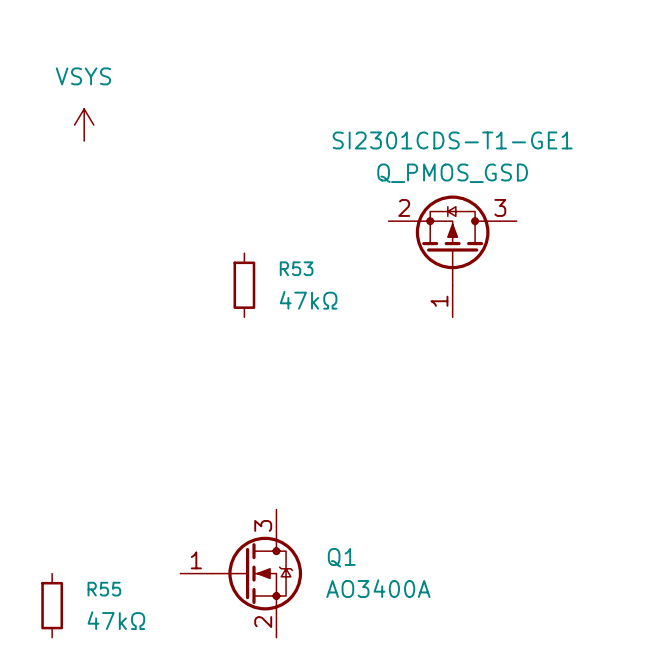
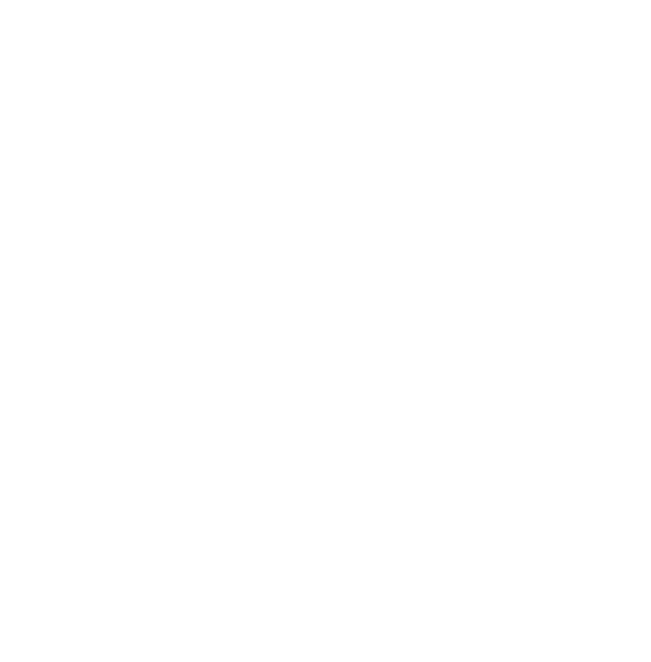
power symbol: VSYS (84, 125) -> none
SI2301CDS-T1-GE1: Q_PMOS_GSD (452, 256) -> none
R53: 47kΩ (244, 285) -> none
Q1: AO3400A (241, 573) -> none
R55: 47kΩ (52, 605) -> none

